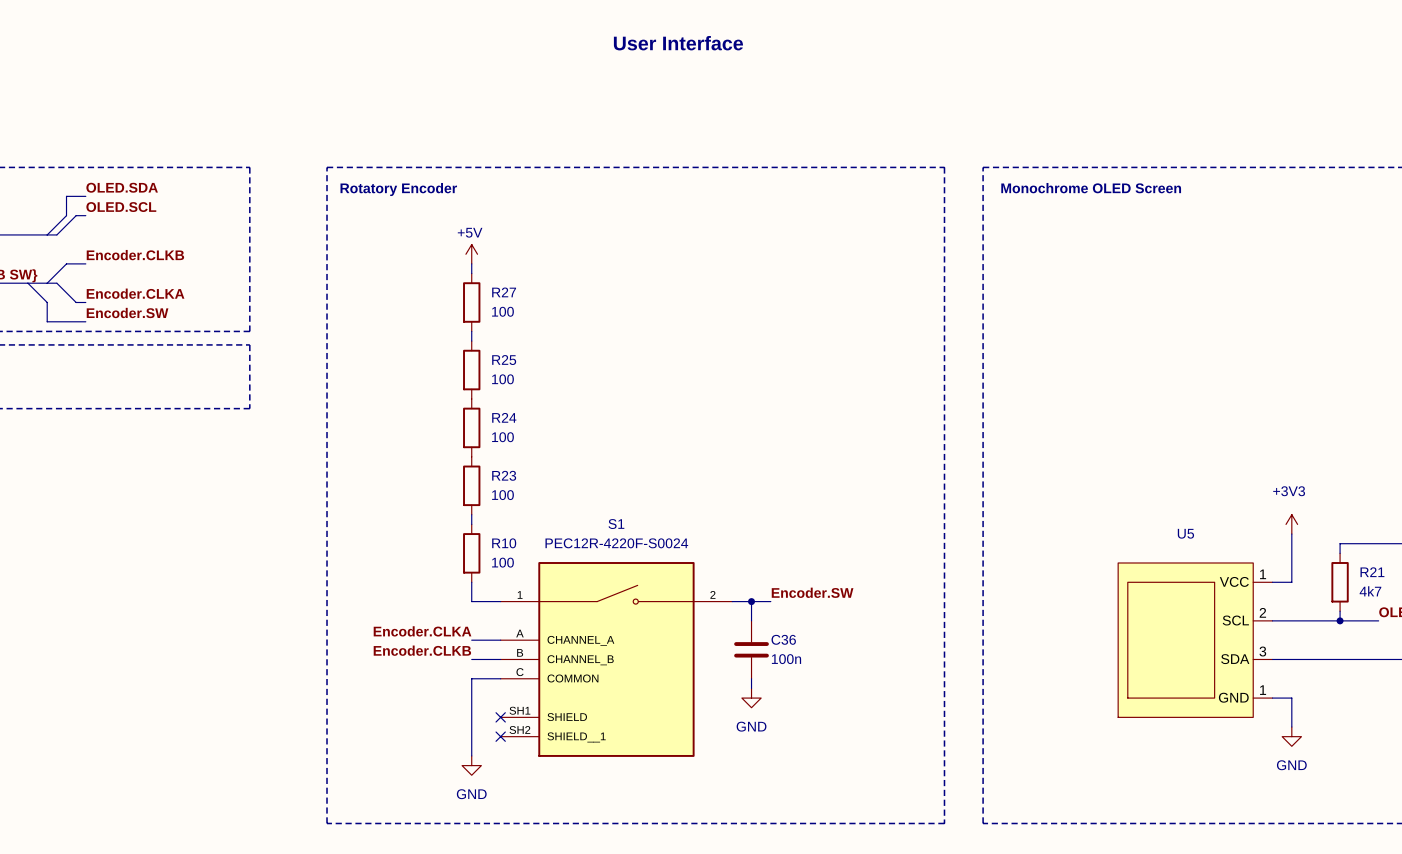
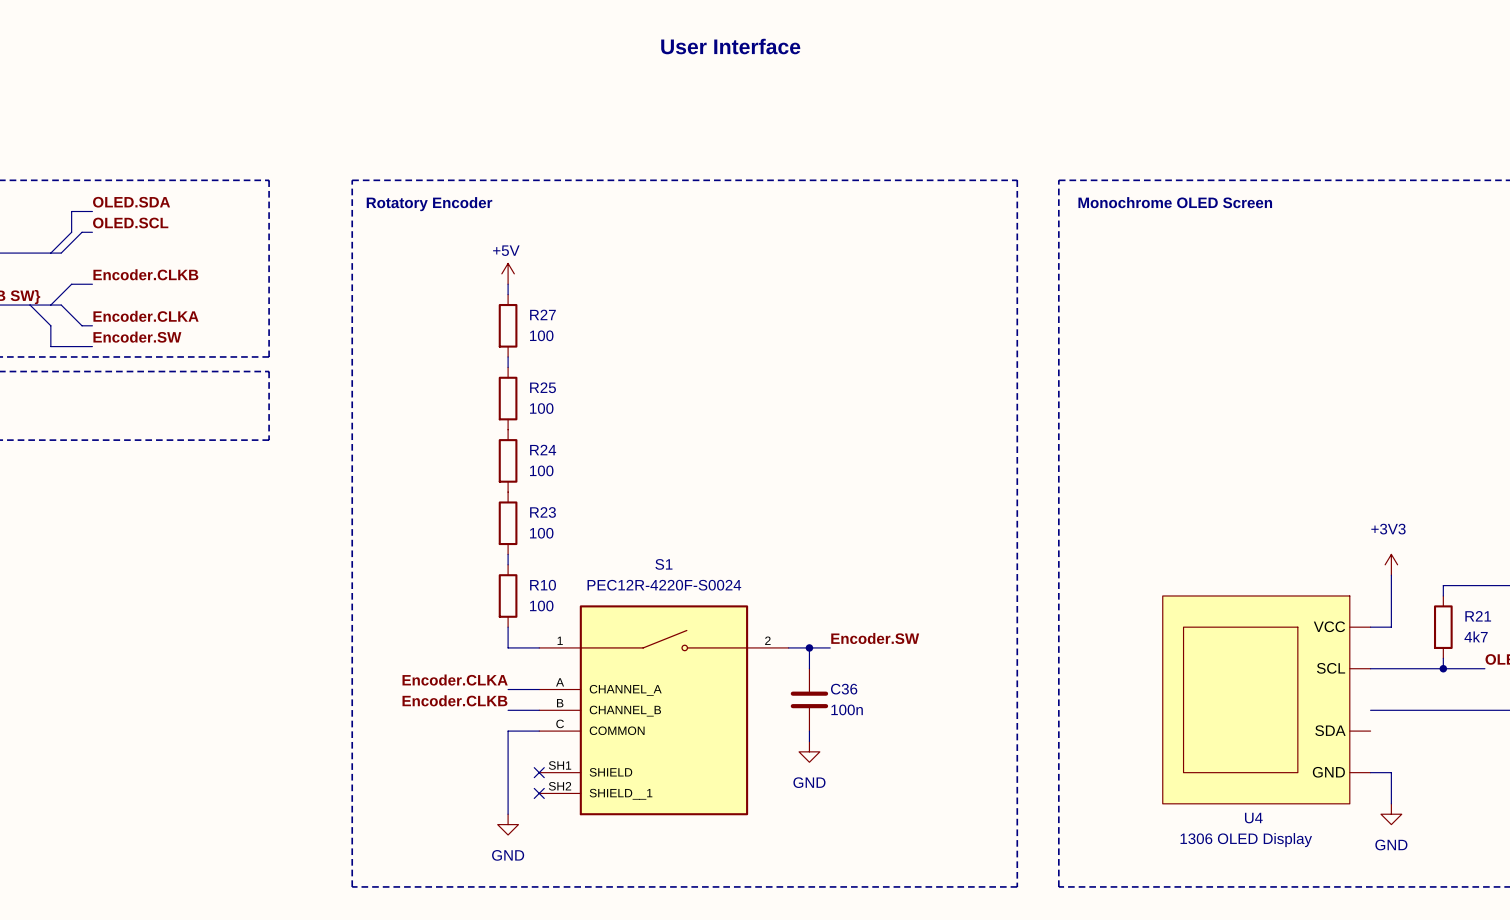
U5: (1195, 640) -> none
U4: none -> 1306 OLED Display (1266, 699)
wire: (1272, 698) (1291, 698) (1291, 717) -> (1370, 772) (1391, 772)
power symbol position: GND (1291, 736) -> GND (1391, 814)

